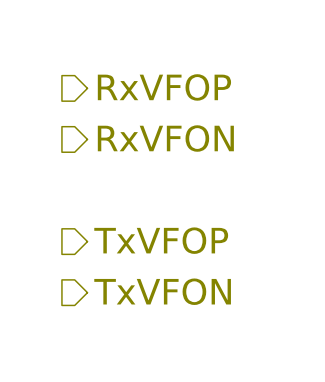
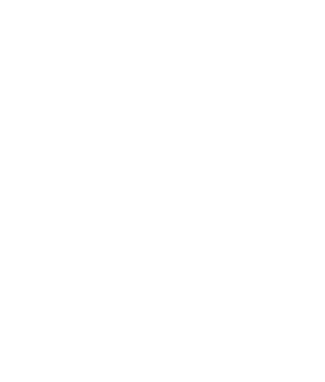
hierarchical label: RxVFOP (164, 87) -> none
hierarchical label: RxVFON (165, 138) -> none
hierarchical label: TxVFOP (161, 240) -> none
hierarchical label: TxVFON (162, 291) -> none

